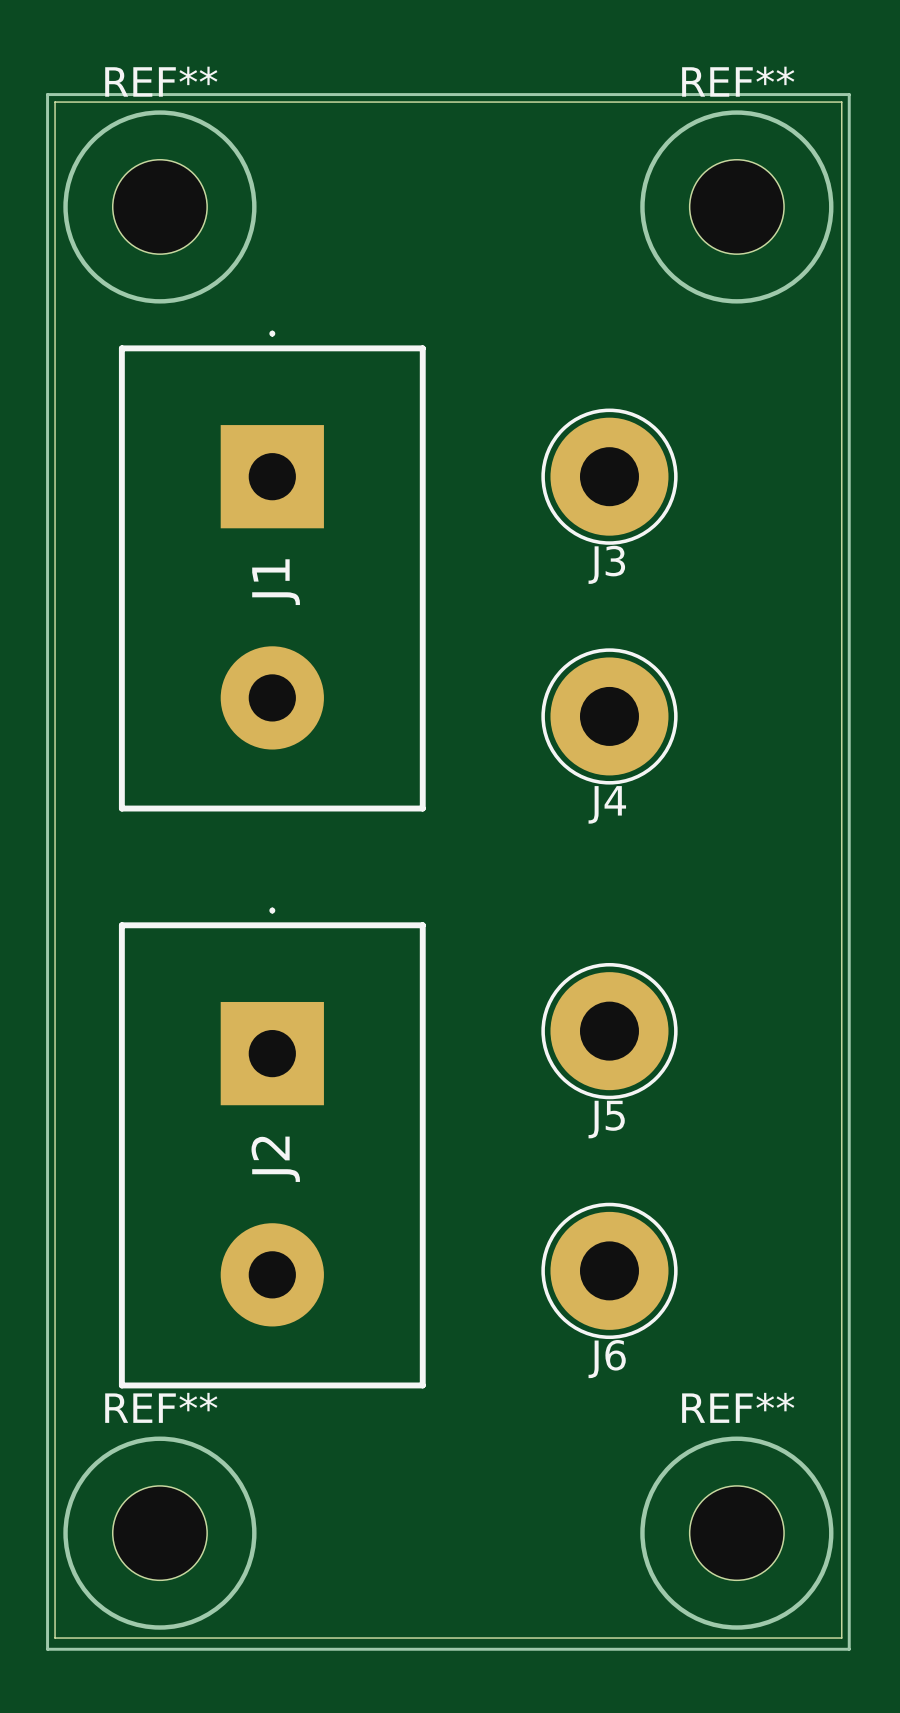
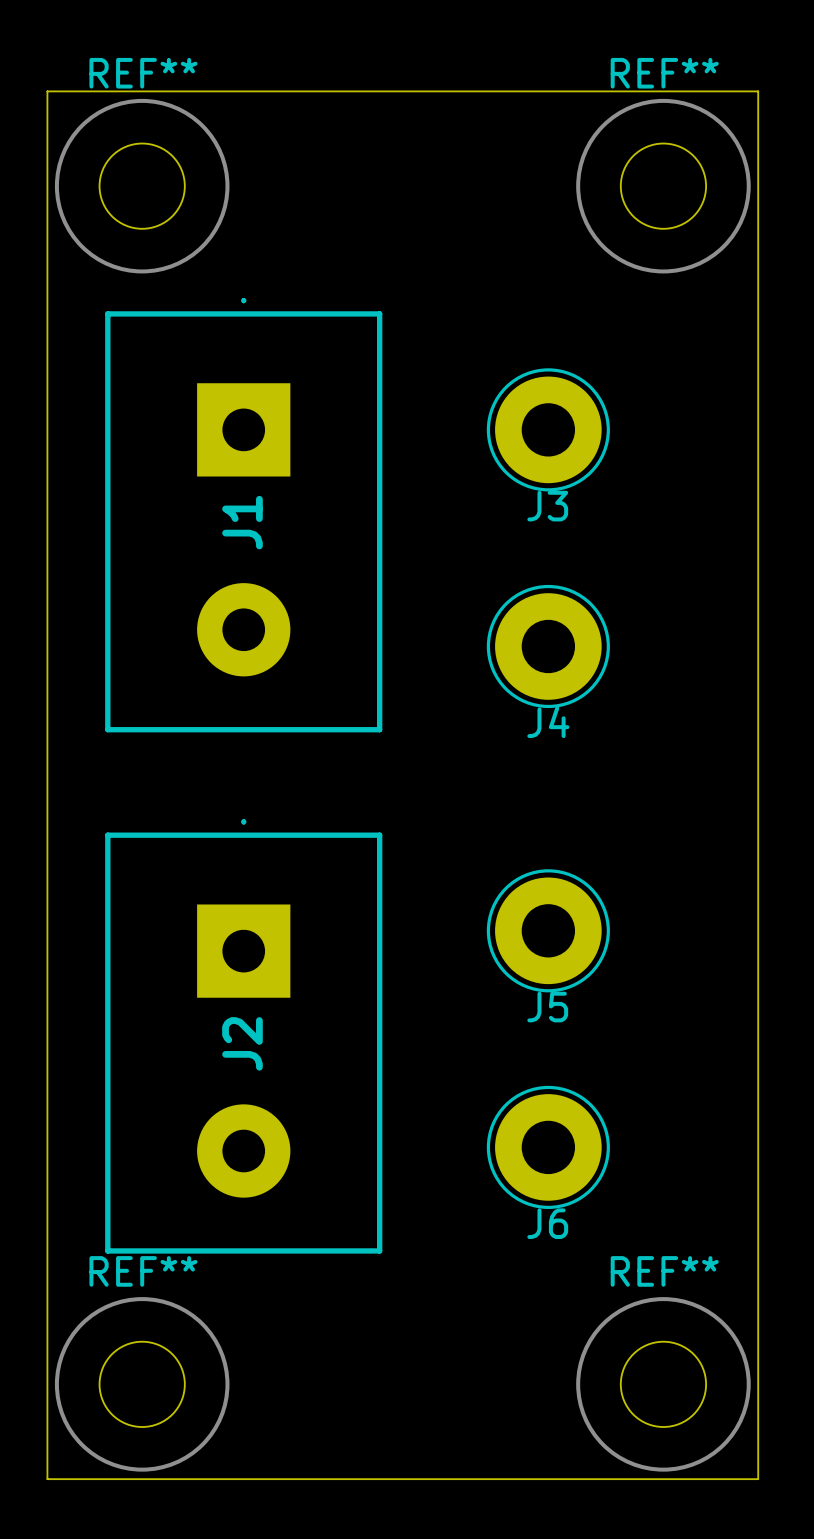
line: (47, 94) (849, 94) (849, 1649) (47, 1649) (47, 94) -> none

